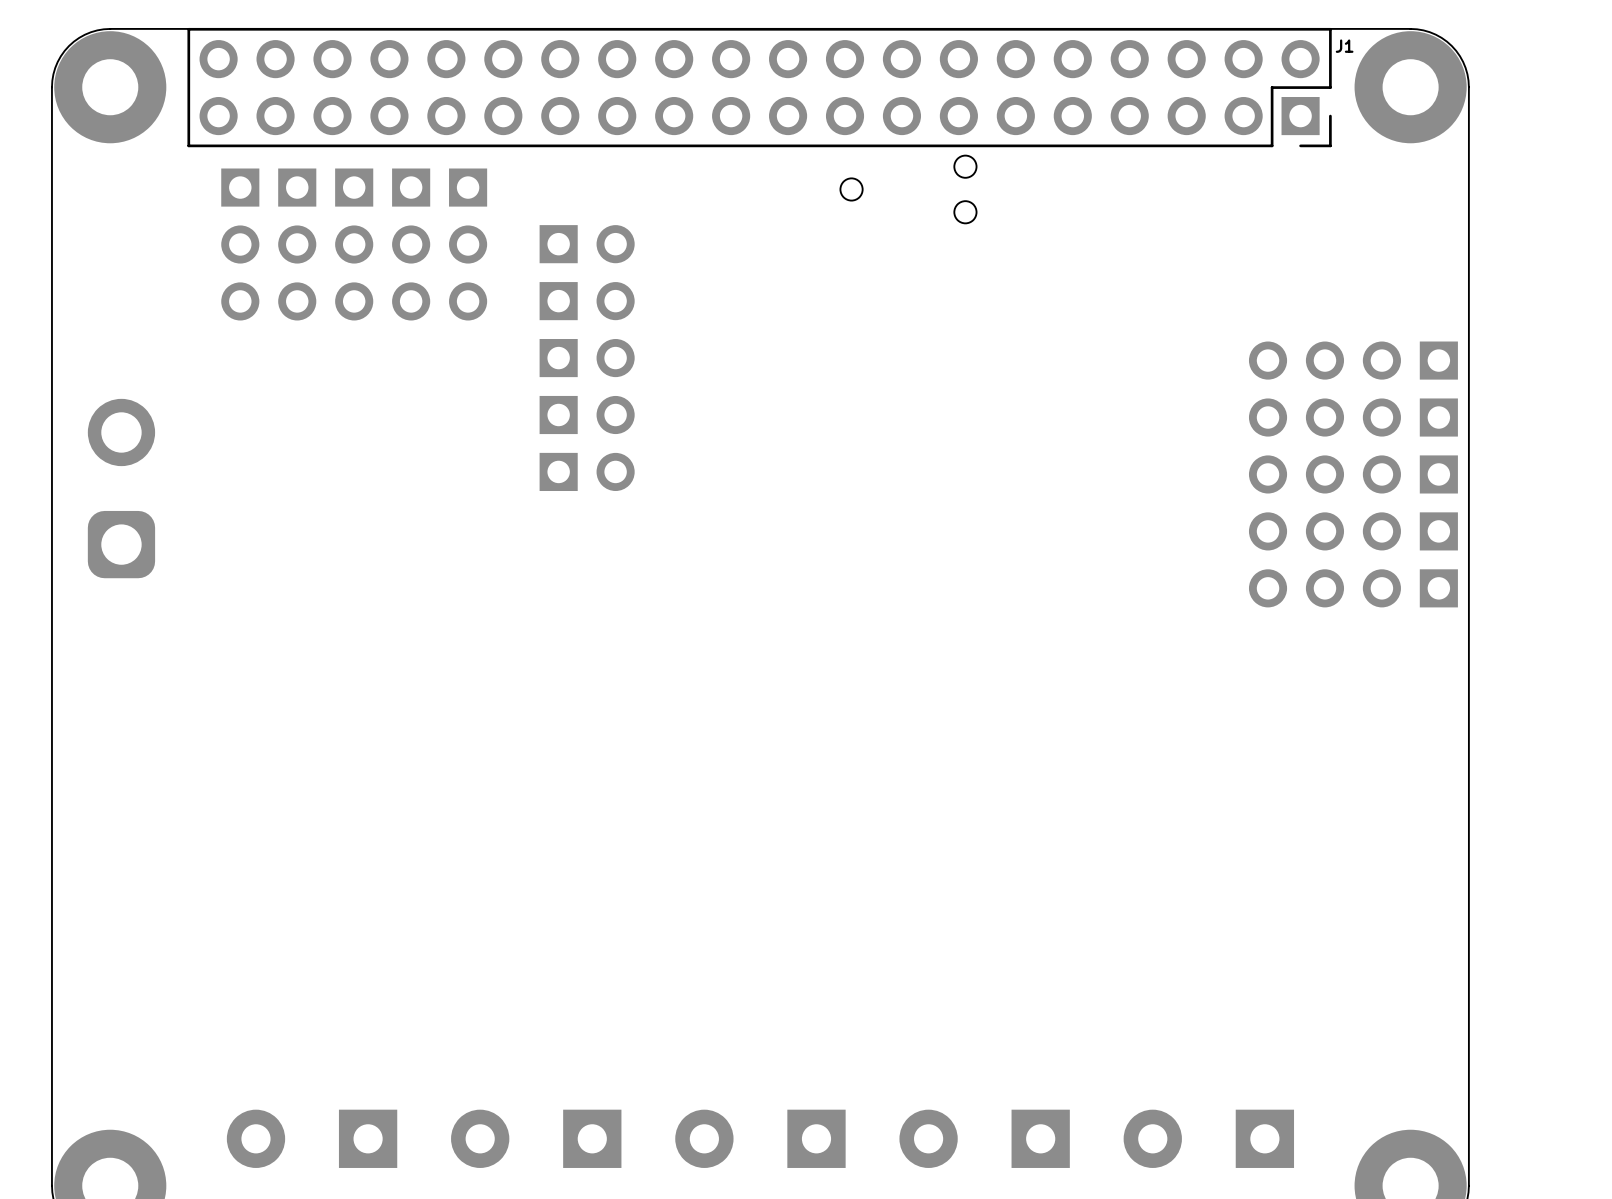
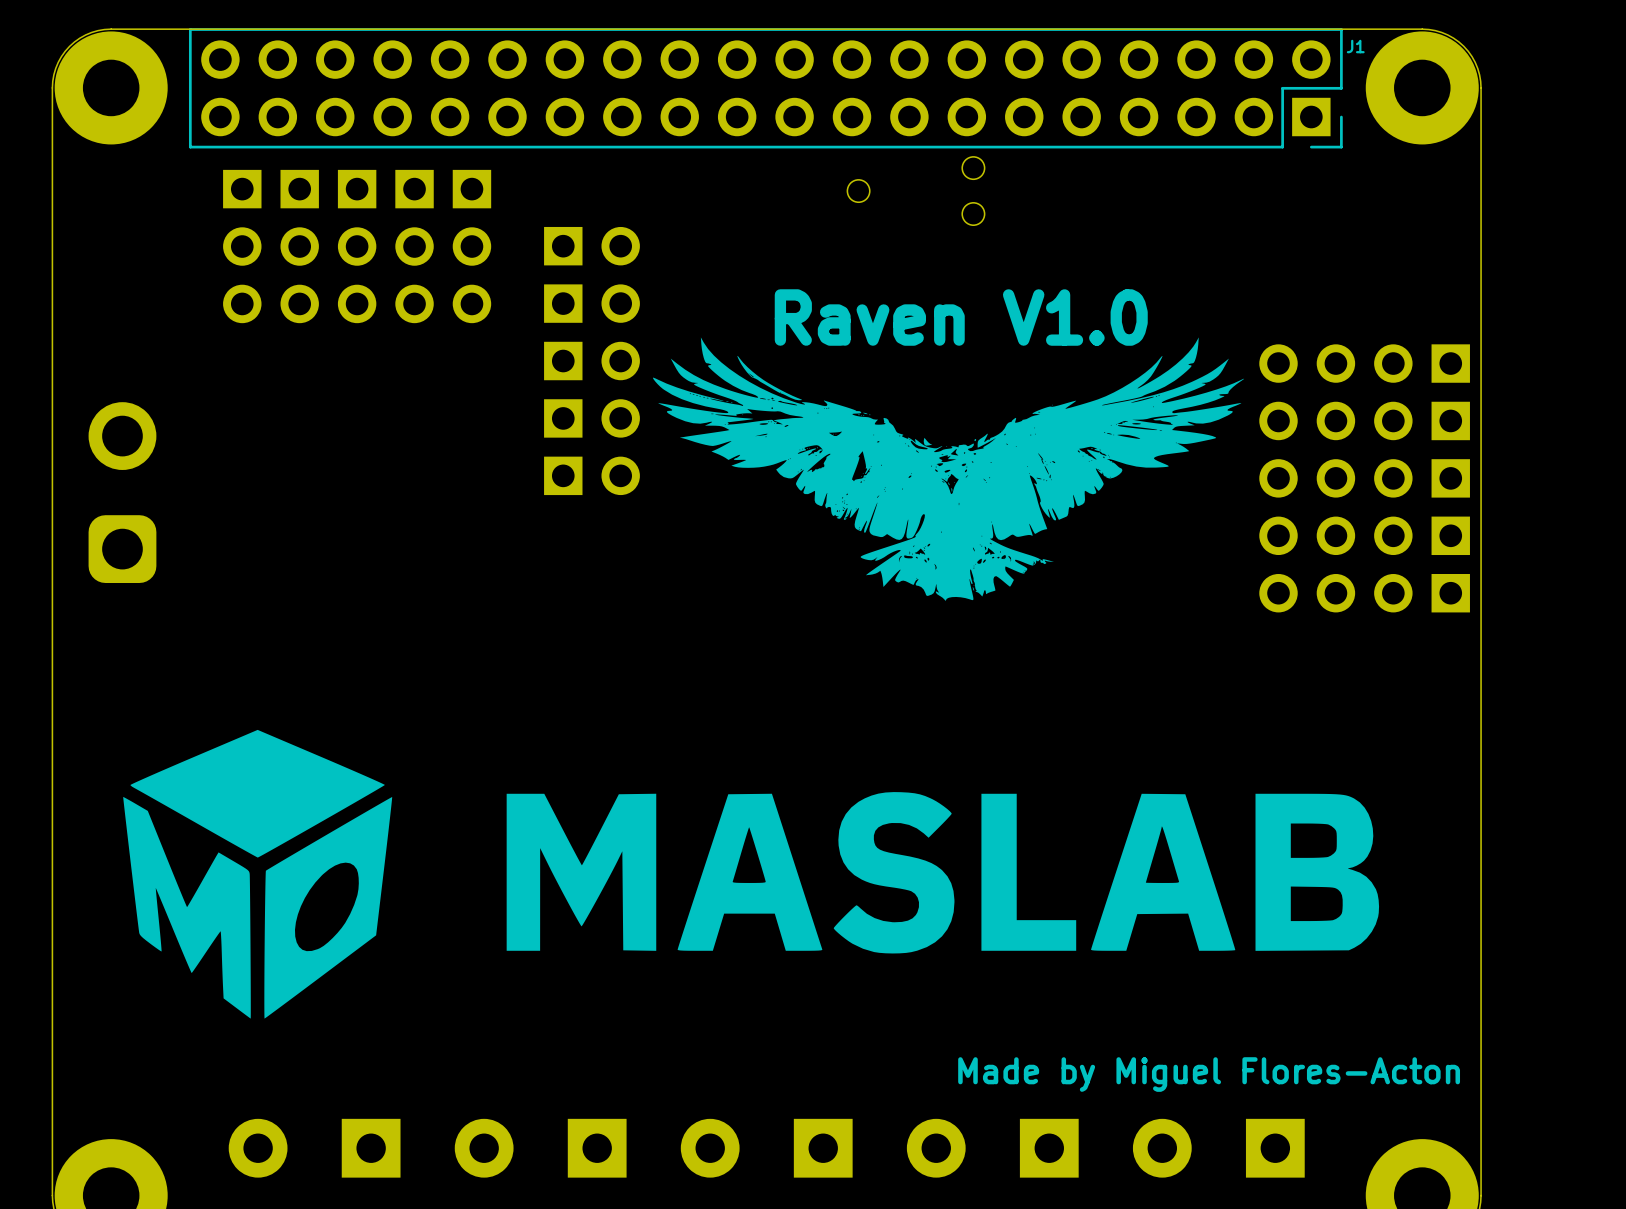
text: none -> Raven V1.0 (961, 317)
drawing: none -> [652, 337, 1245, 601]
drawing: none -> [123, 729, 1380, 1019]
text: none -> Made by Miguel Flores-Acton (1209, 1074)

